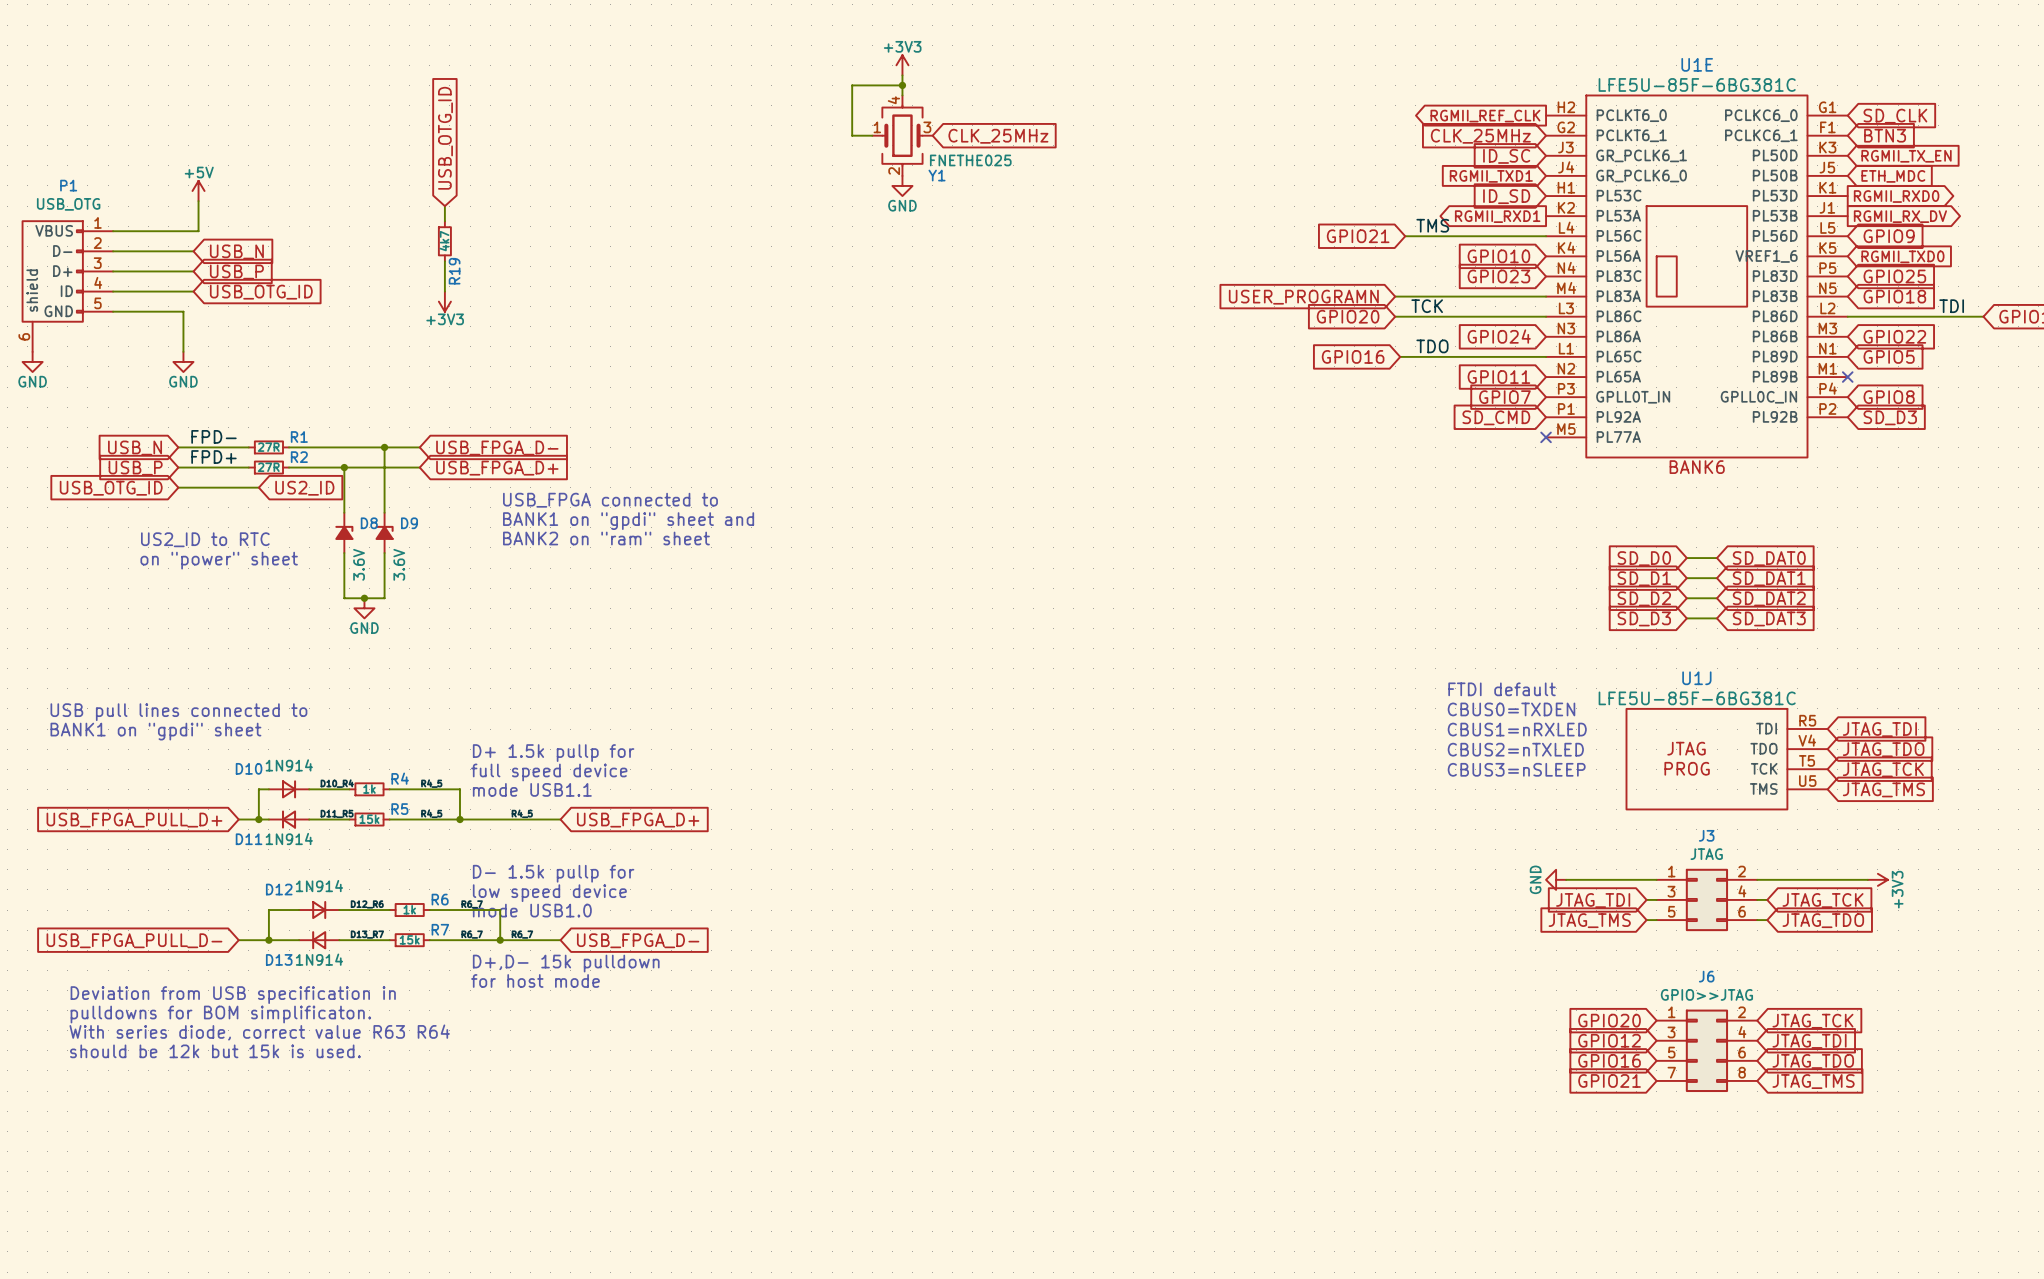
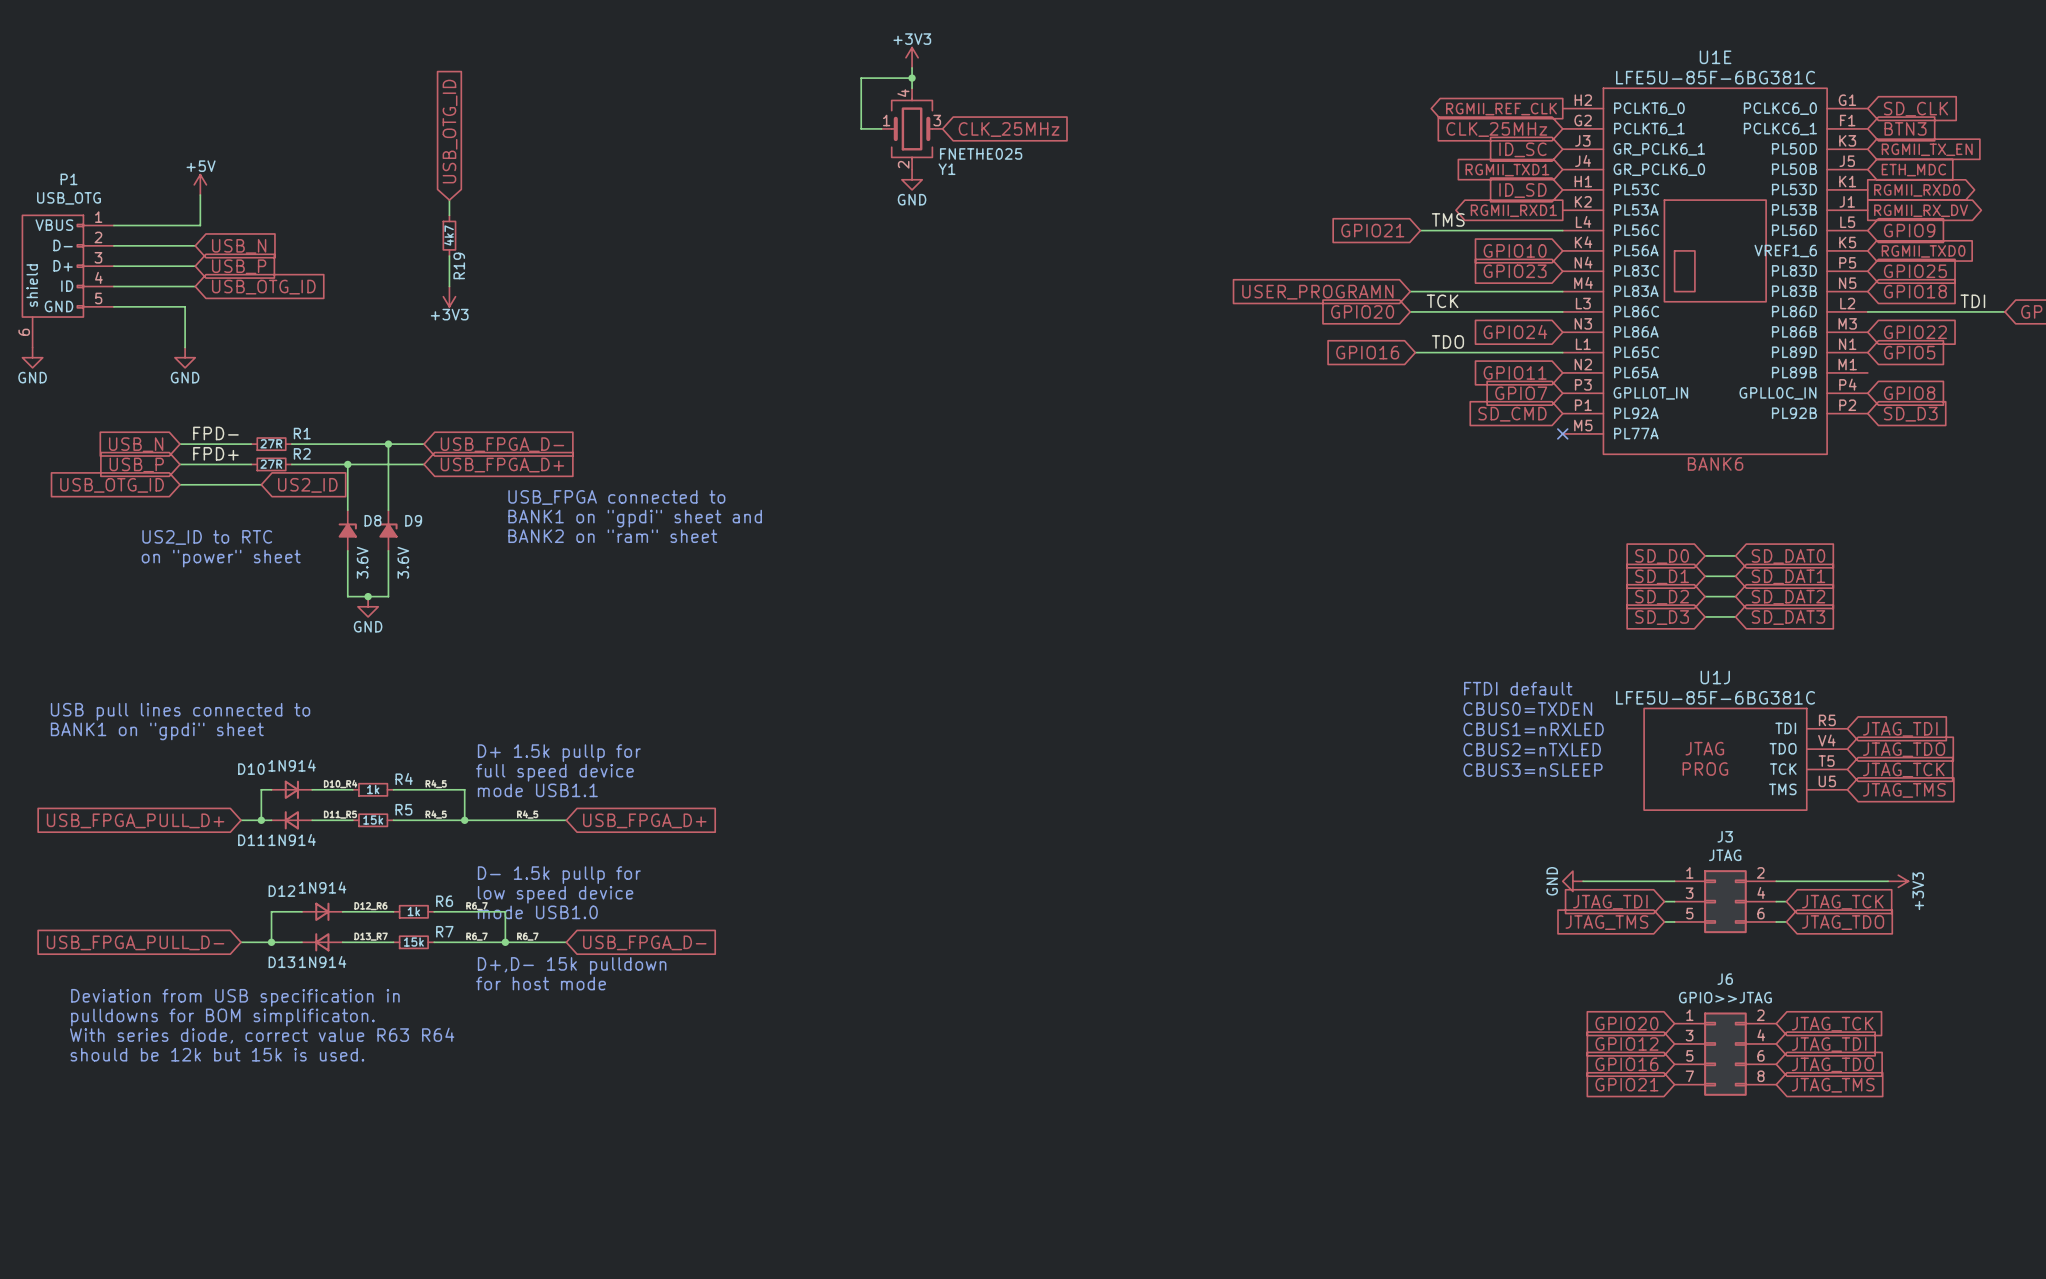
no-connect mark: (1847, 377) -> none

